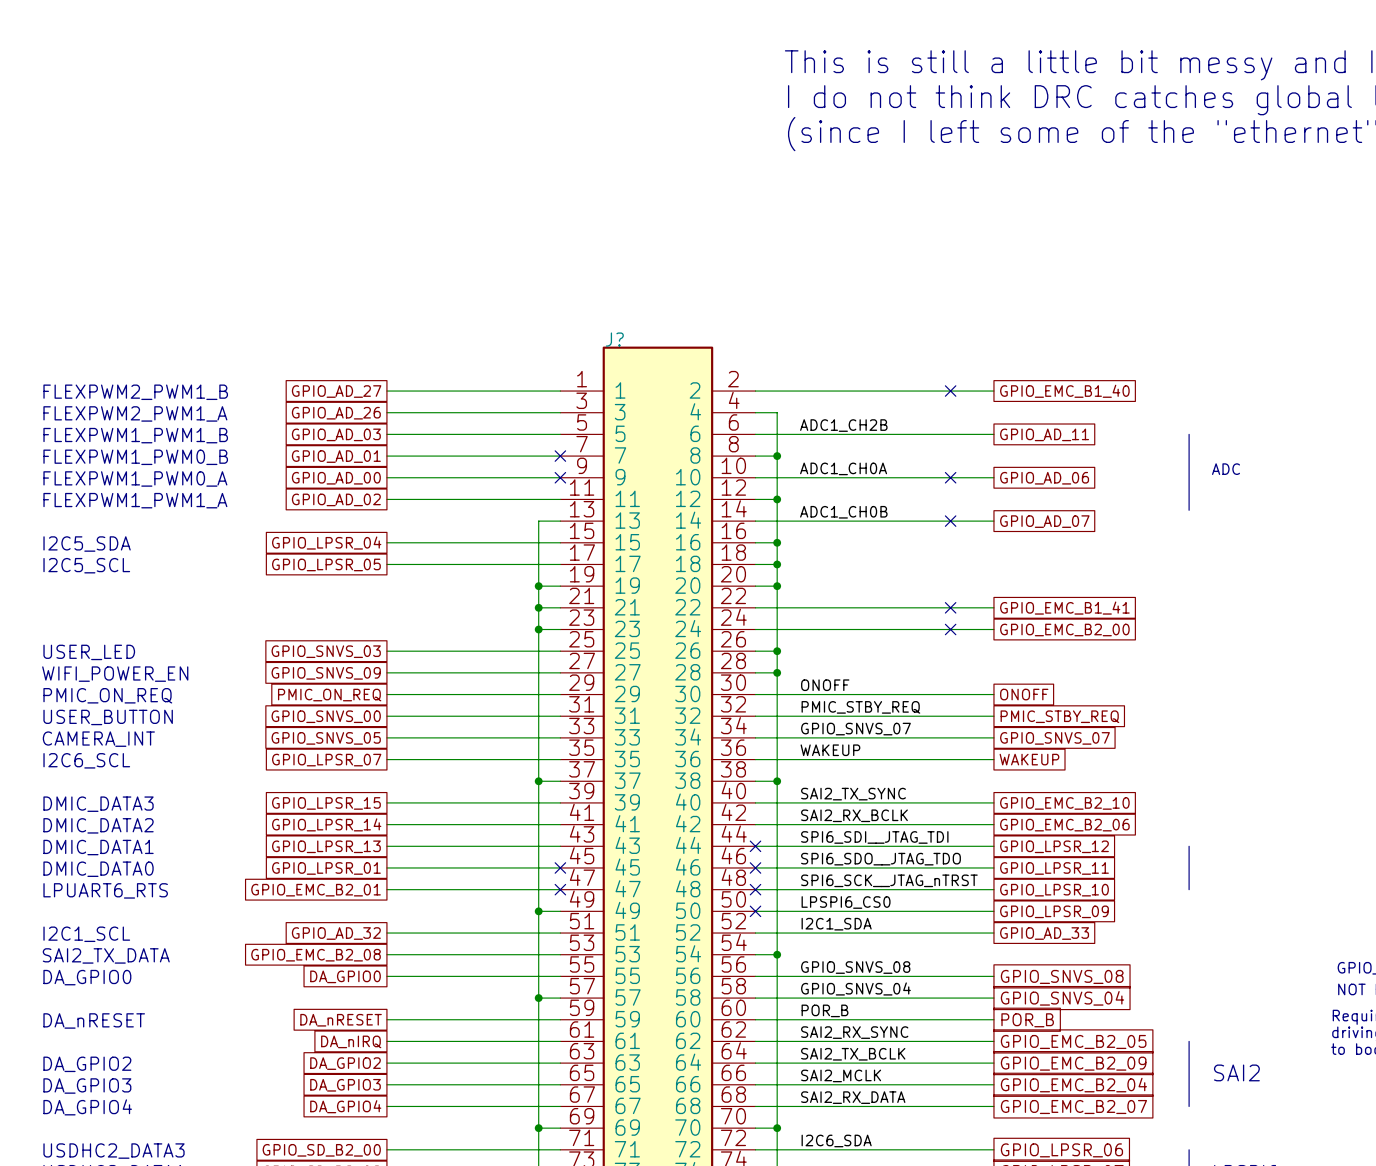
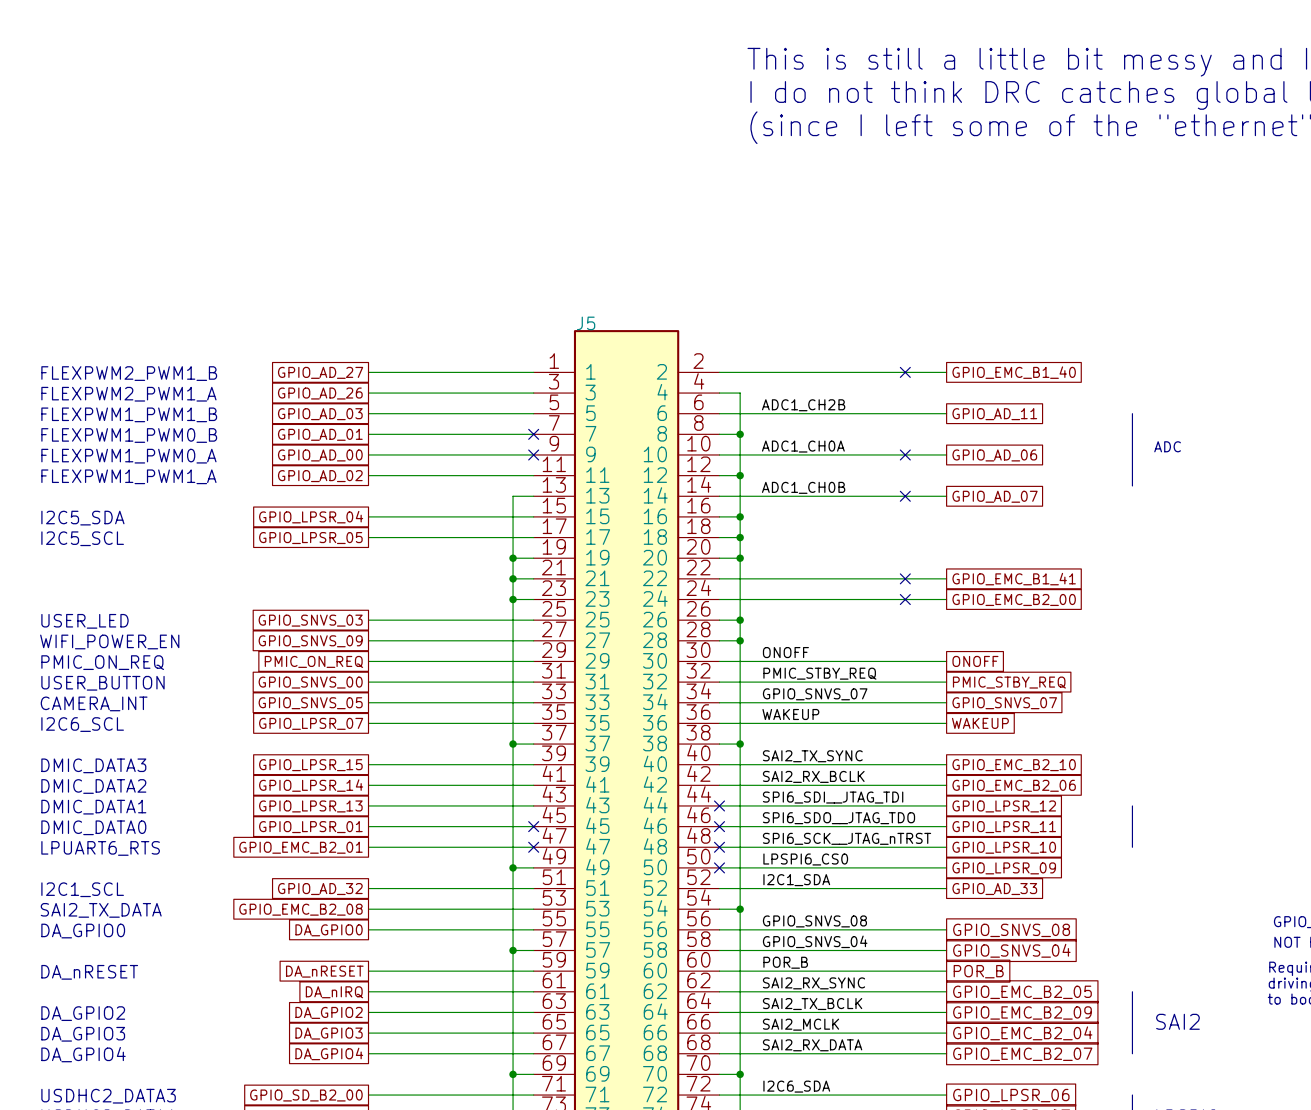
J? name: J? (614, 339) -> J5 (586, 323)

